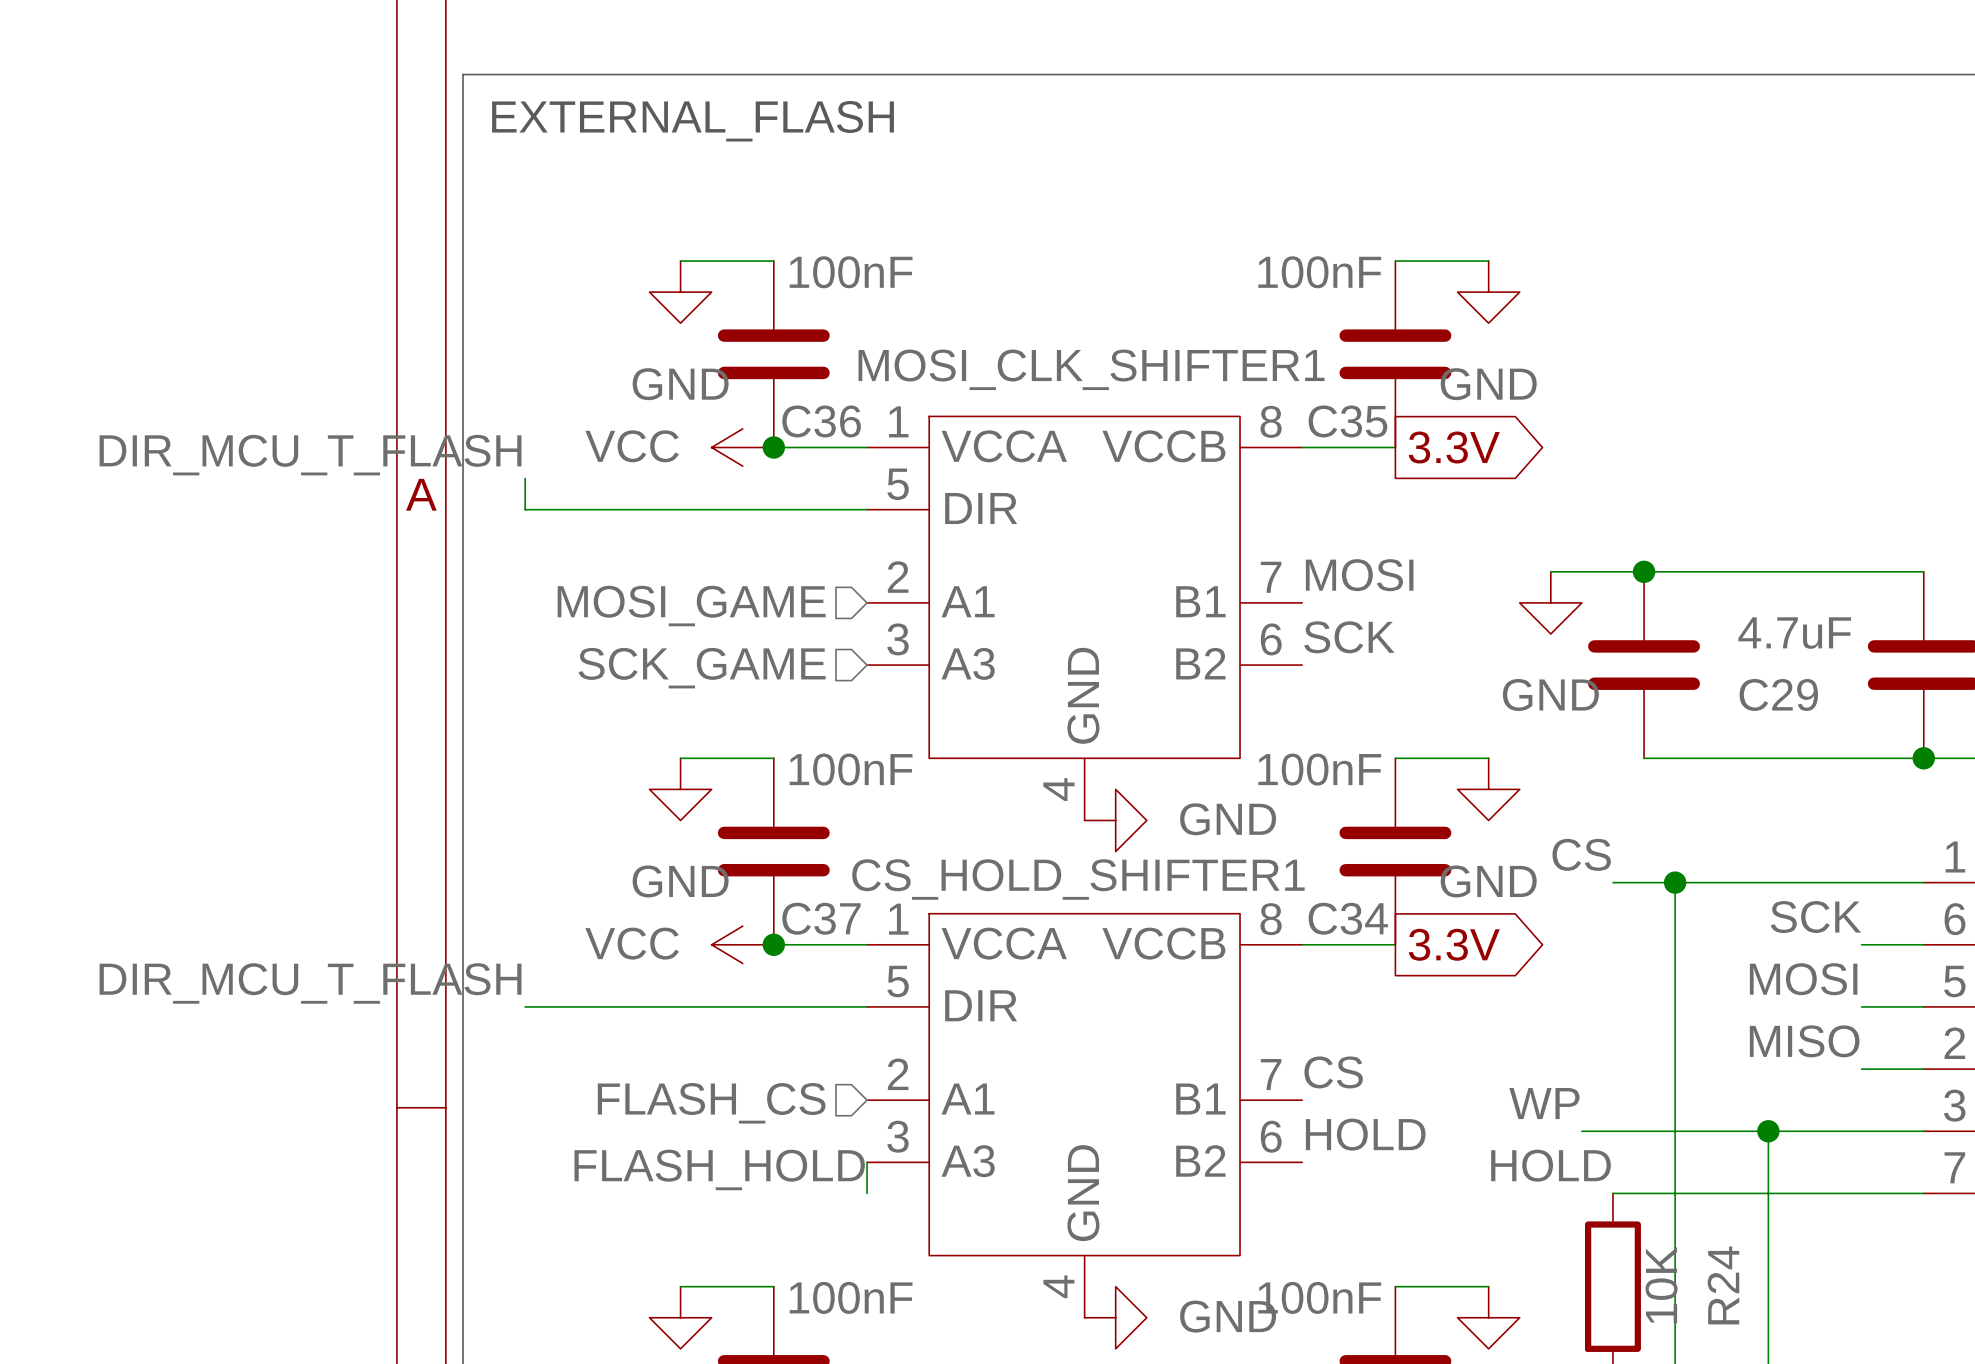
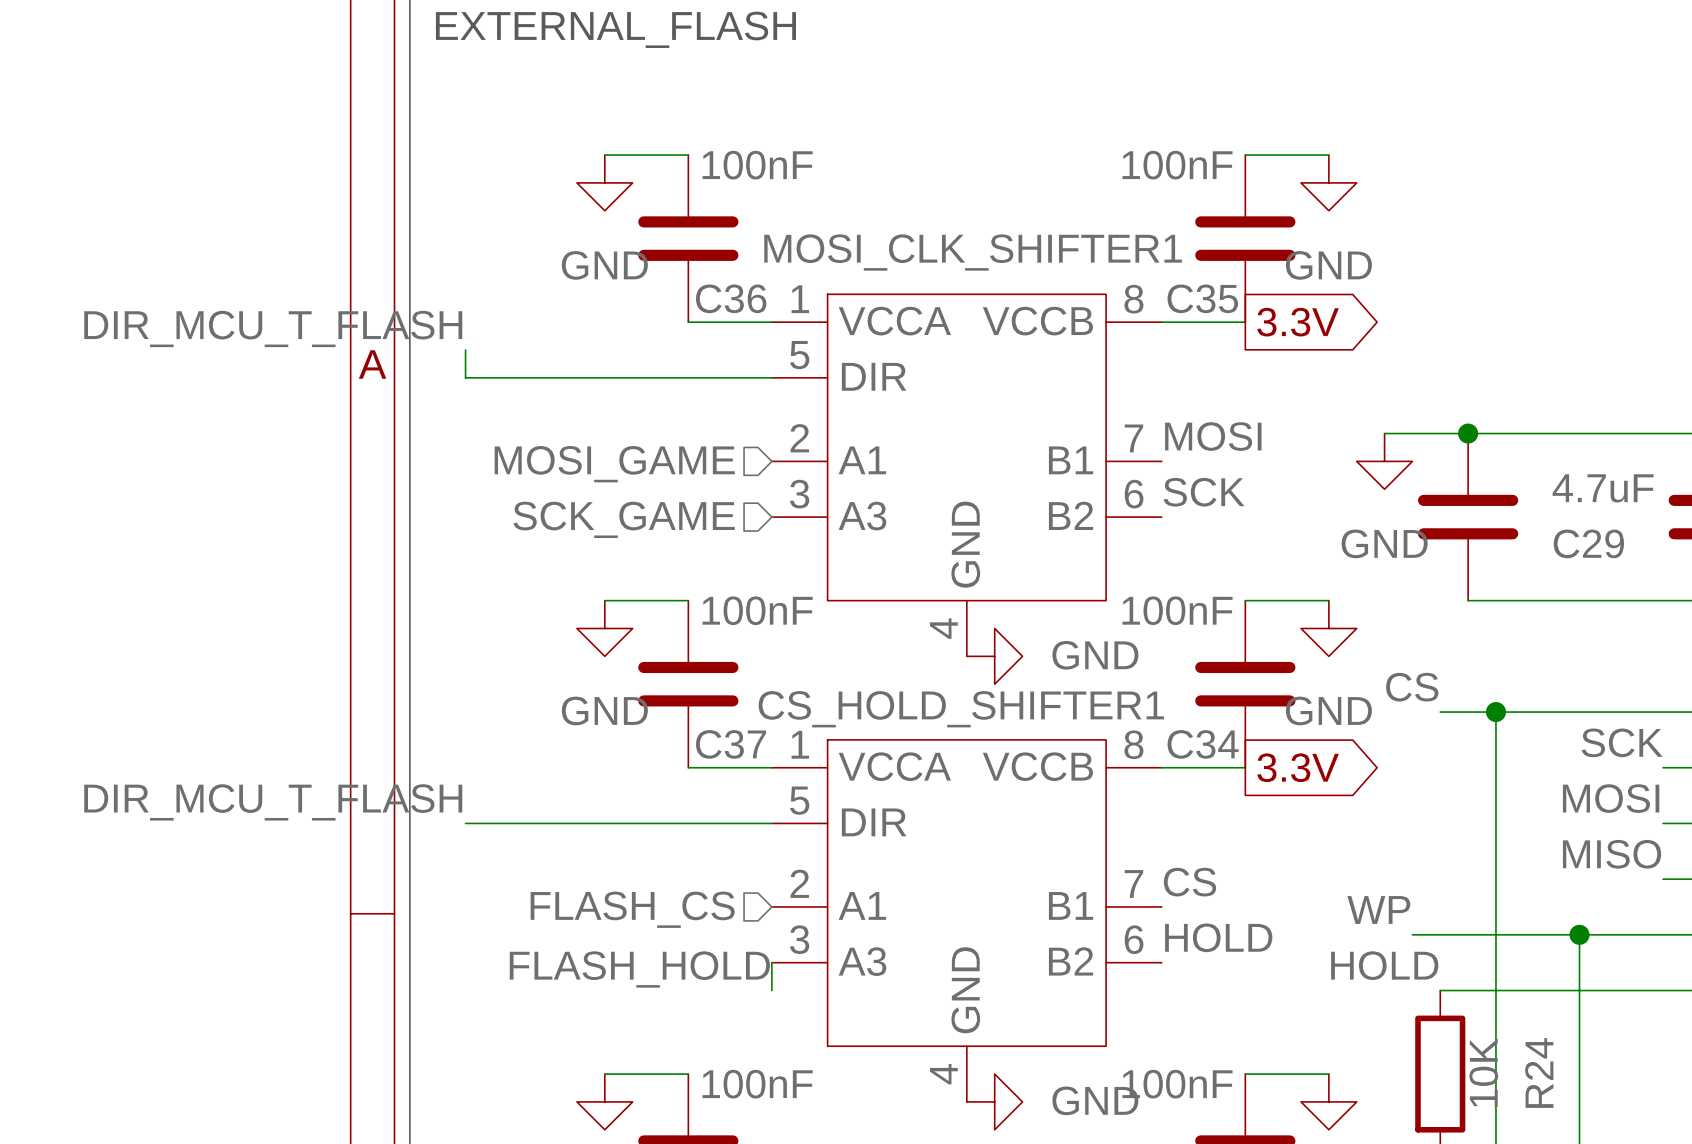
power symbol: VCC (742, 447) -> none
junction: (773, 447) -> none
power symbol: VCC (742, 944) -> none
junction: (773, 944) -> none

